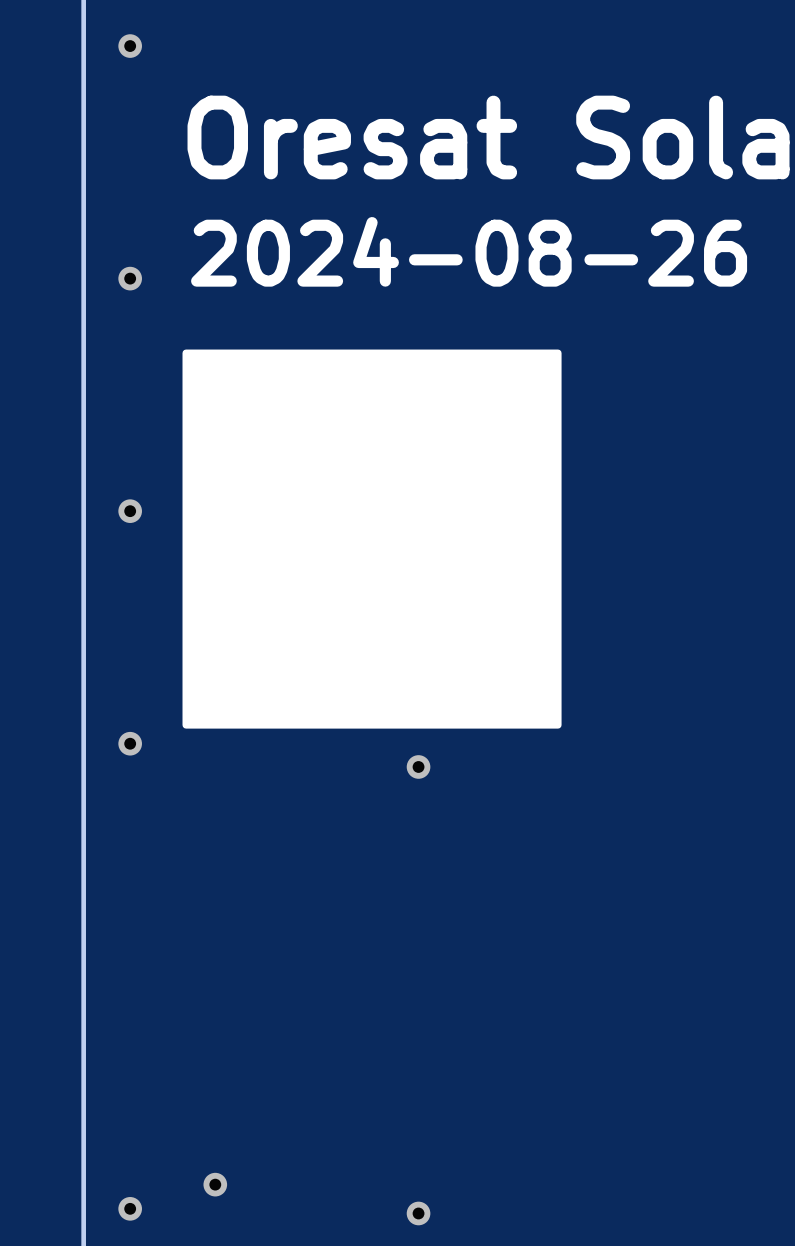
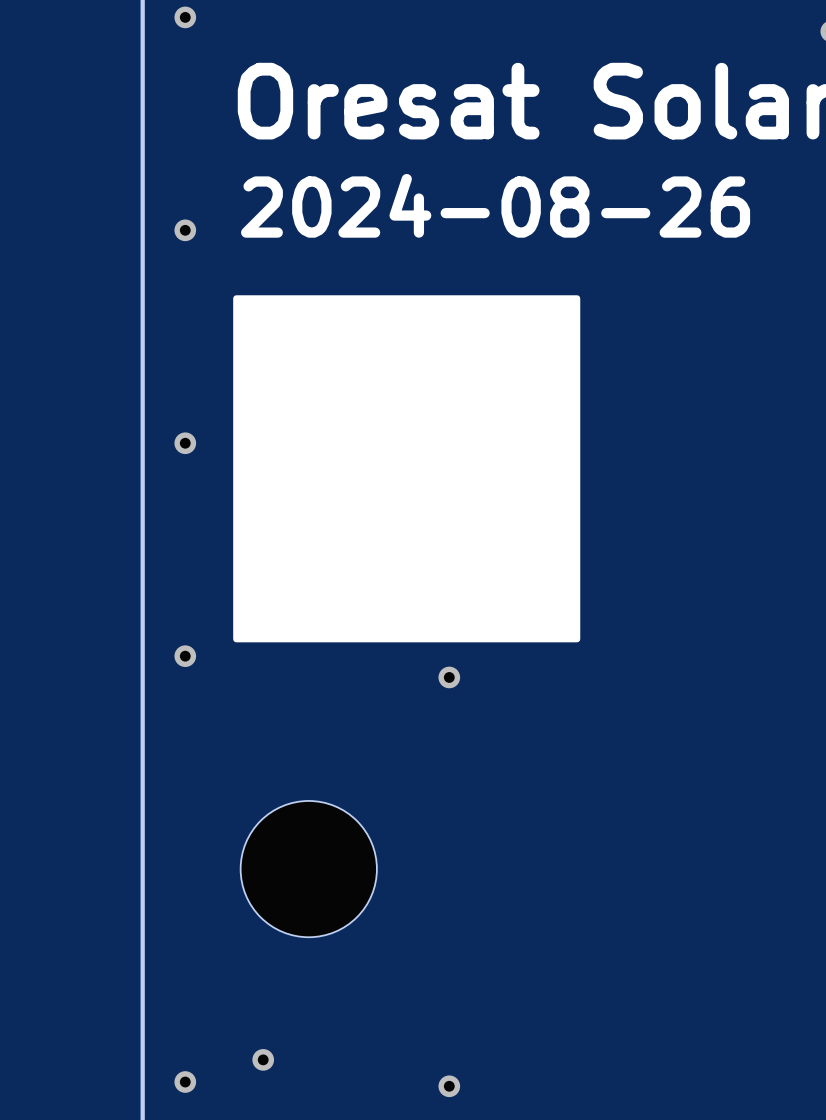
part: none -> (308, 869)

